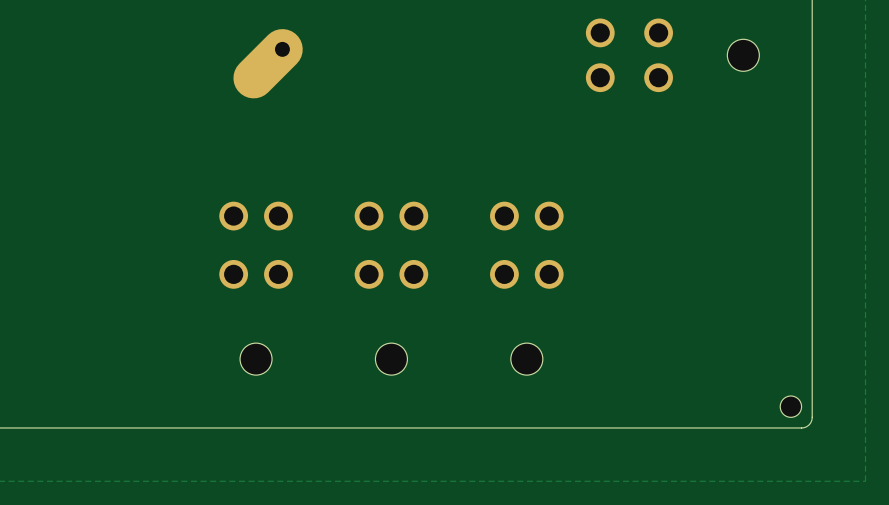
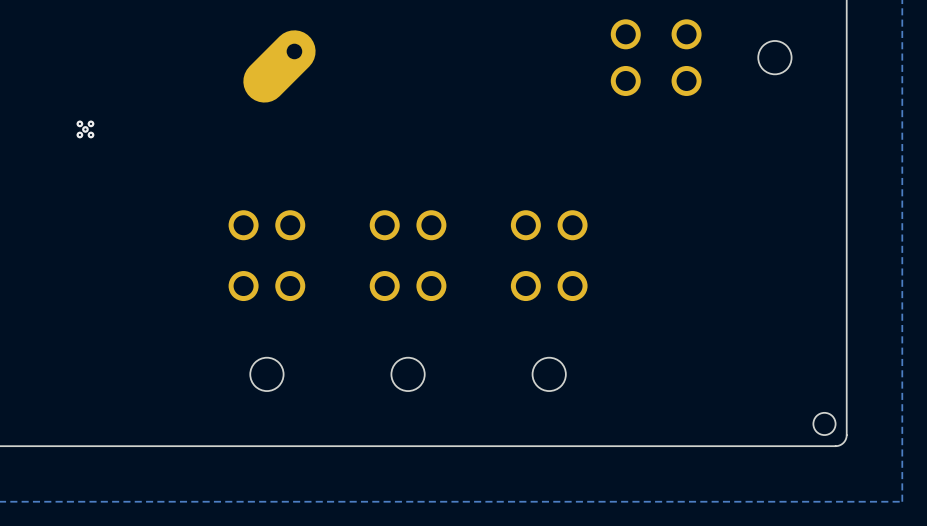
via: none -> (79, 123)
via: none -> (91, 123)
via: none -> (85, 129)
via: none -> (79, 134)
via: none -> (91, 134)

